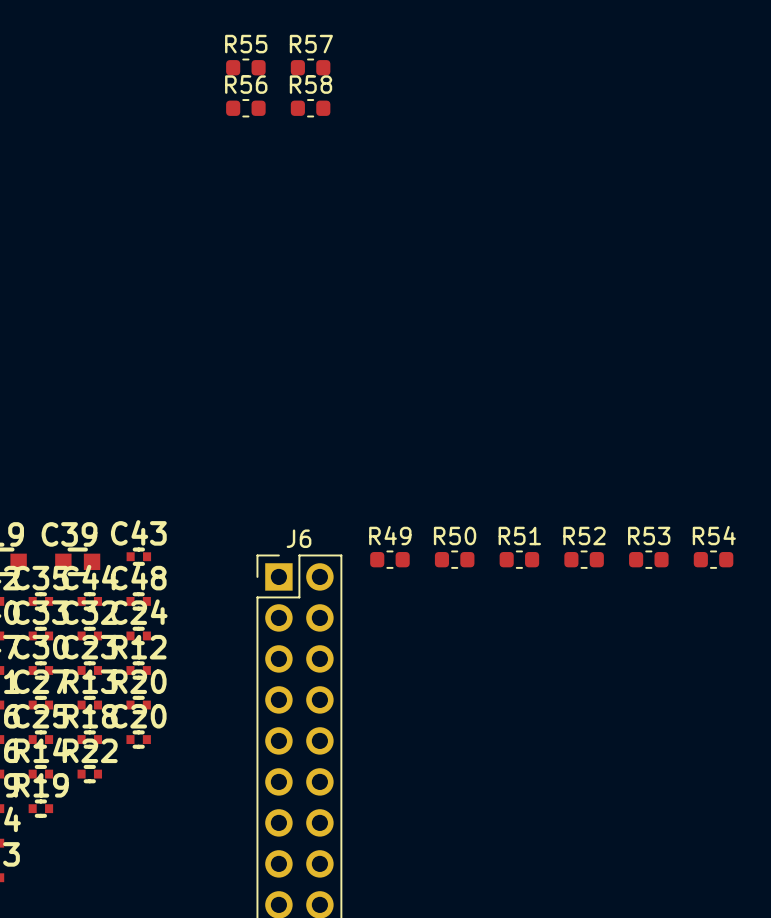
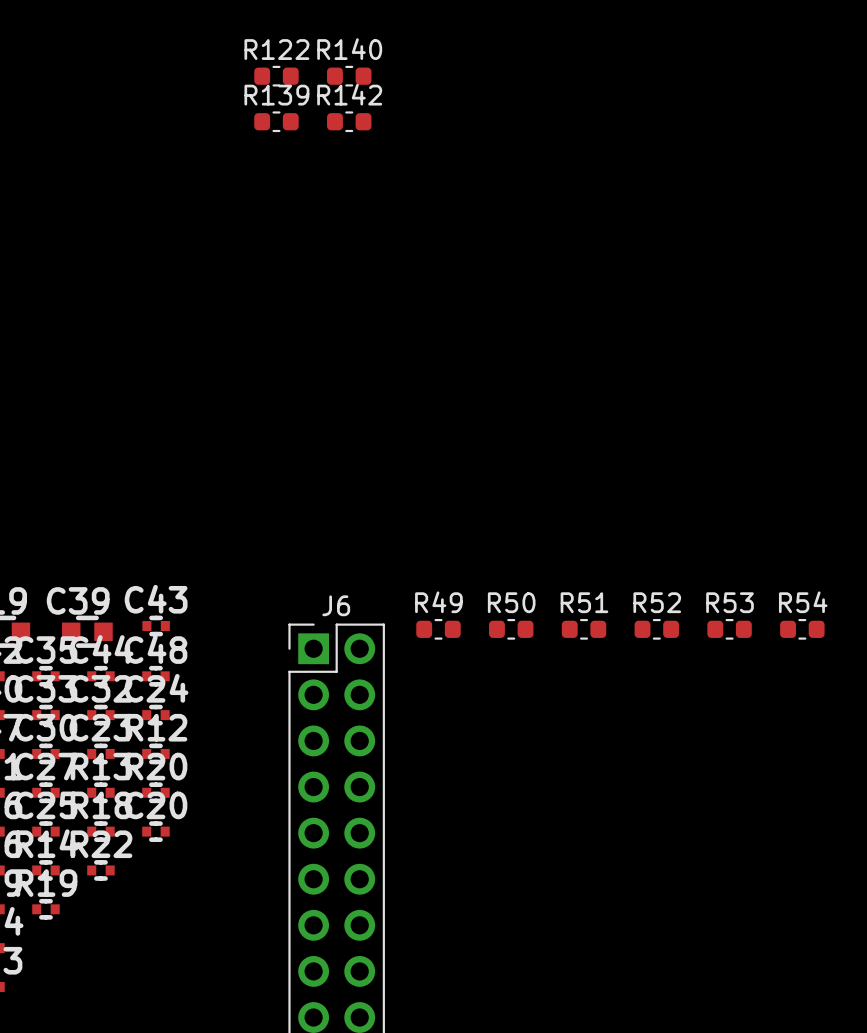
R55 name: R55 (246, 44) -> R122 (276, 49)
R57 name: R57 (311, 44) -> R140 (349, 49)
R56 name: R56 (246, 84) -> R139 (276, 95)
R58 name: R58 (310, 84) -> R142 (349, 94)

